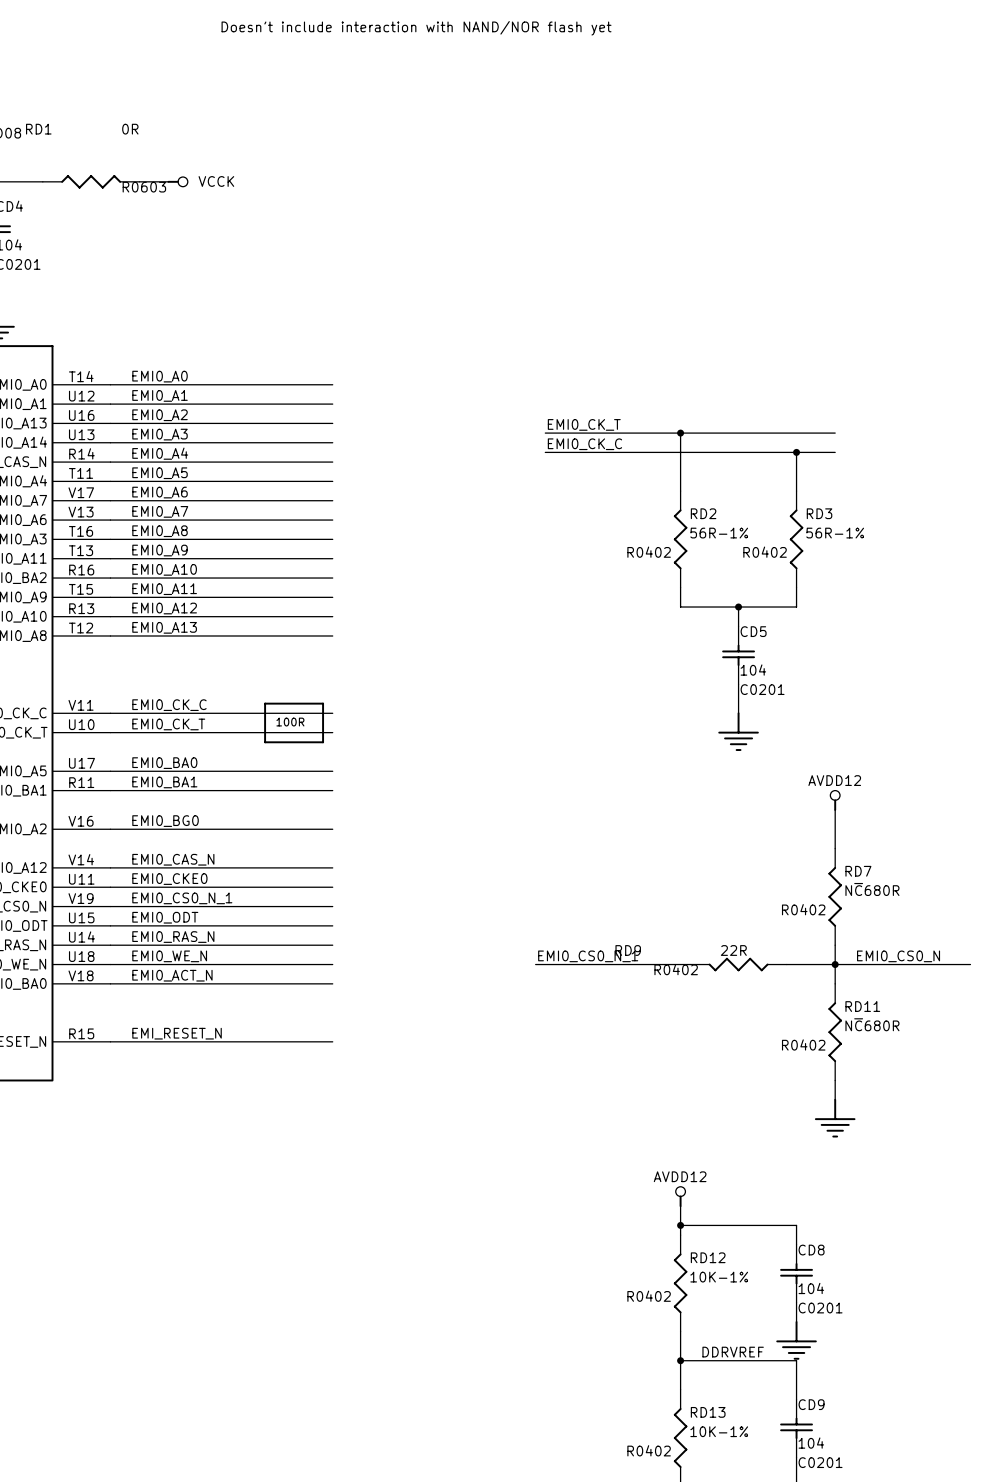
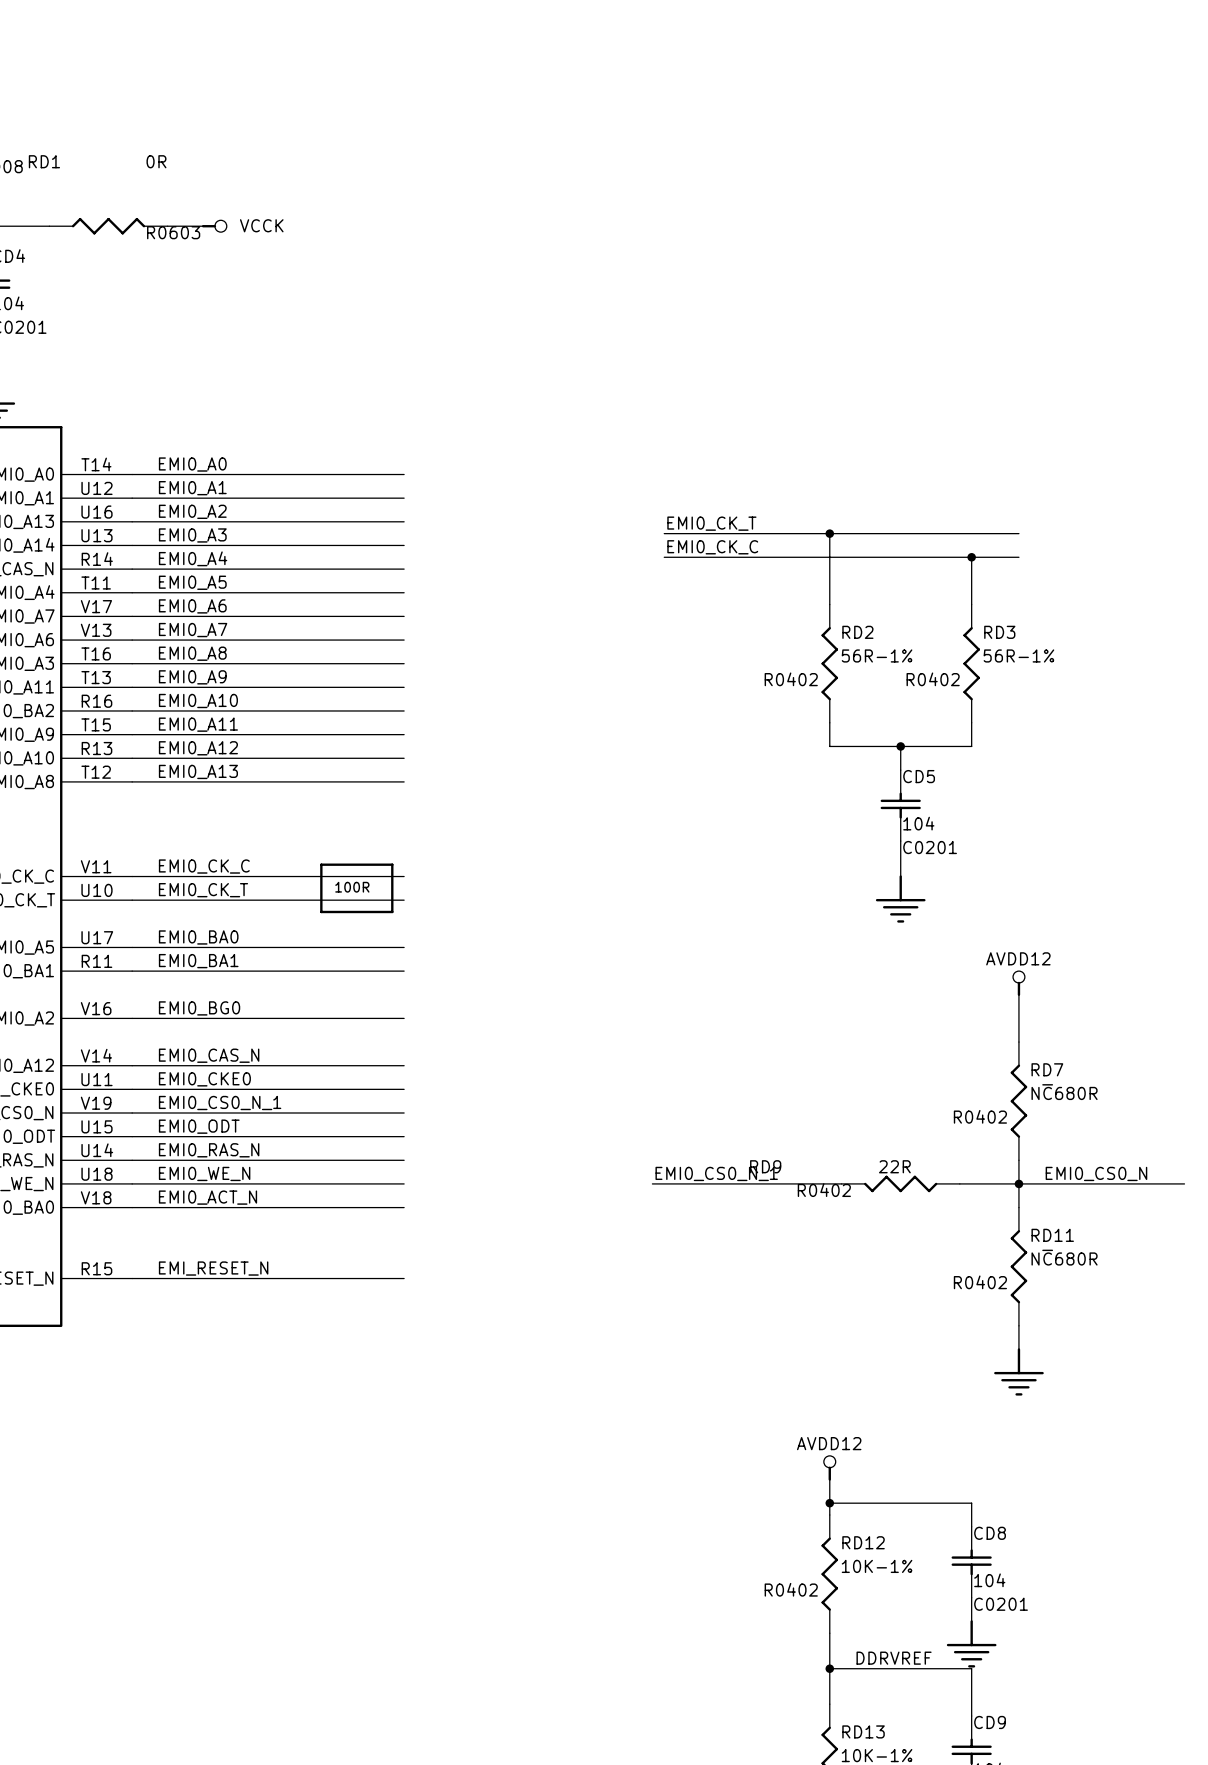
text: Doesn't include interaction with NAND/NOR flash yet (416, 28) -> none

